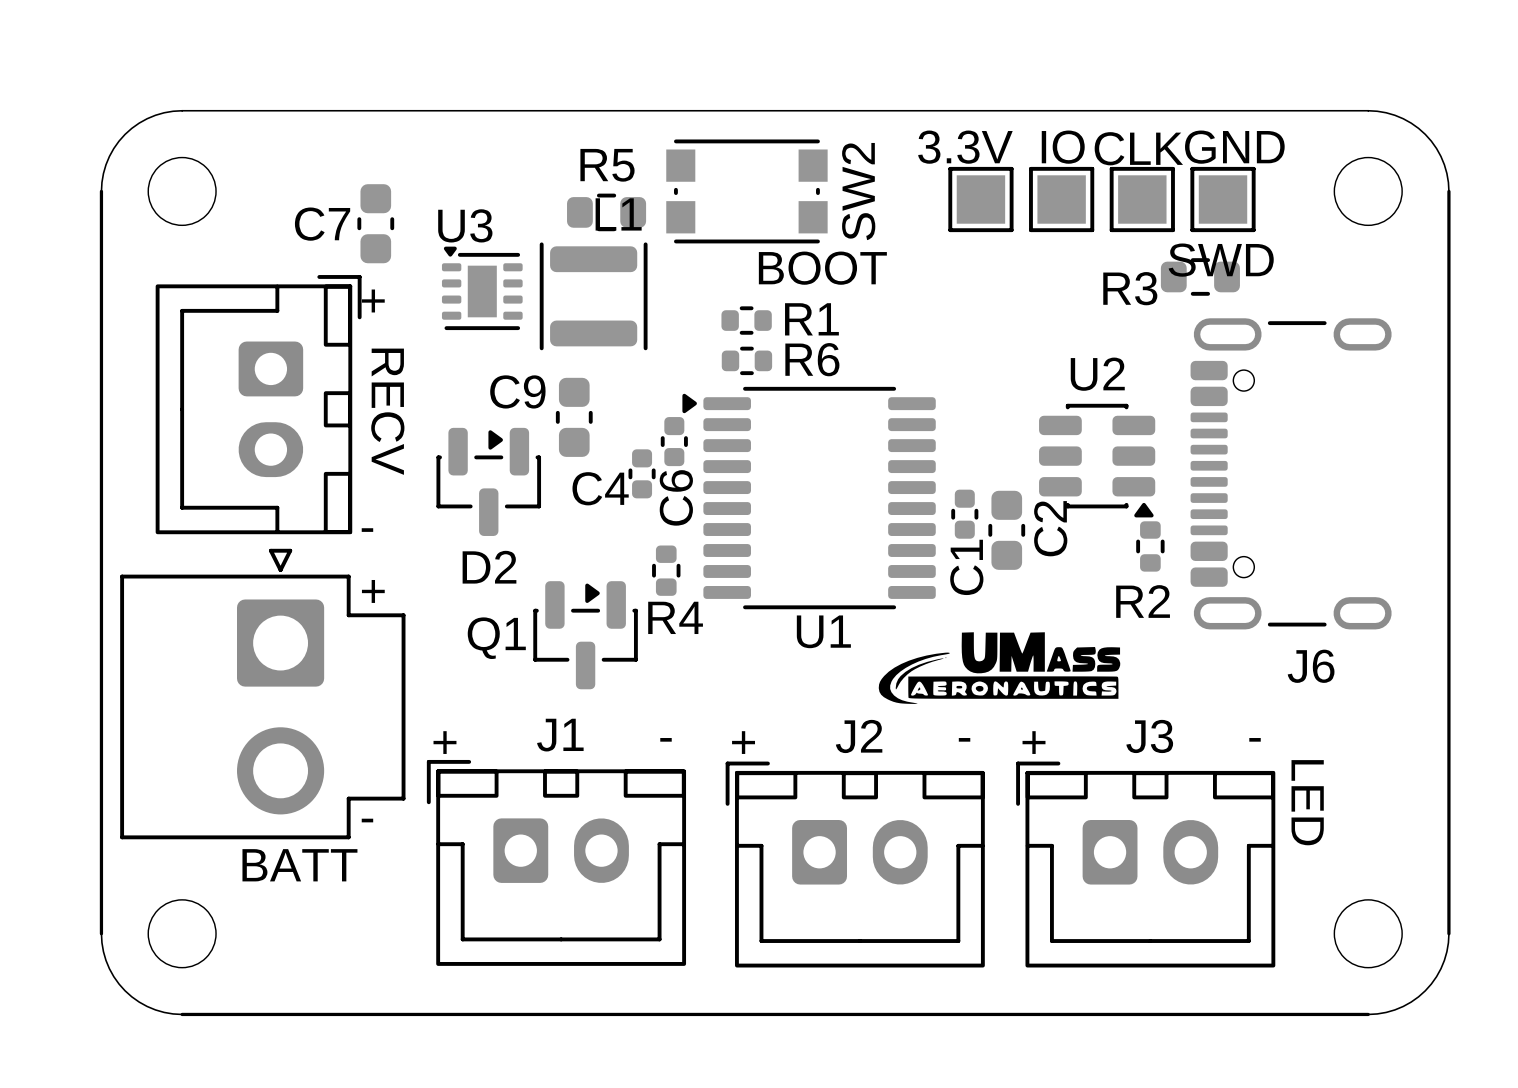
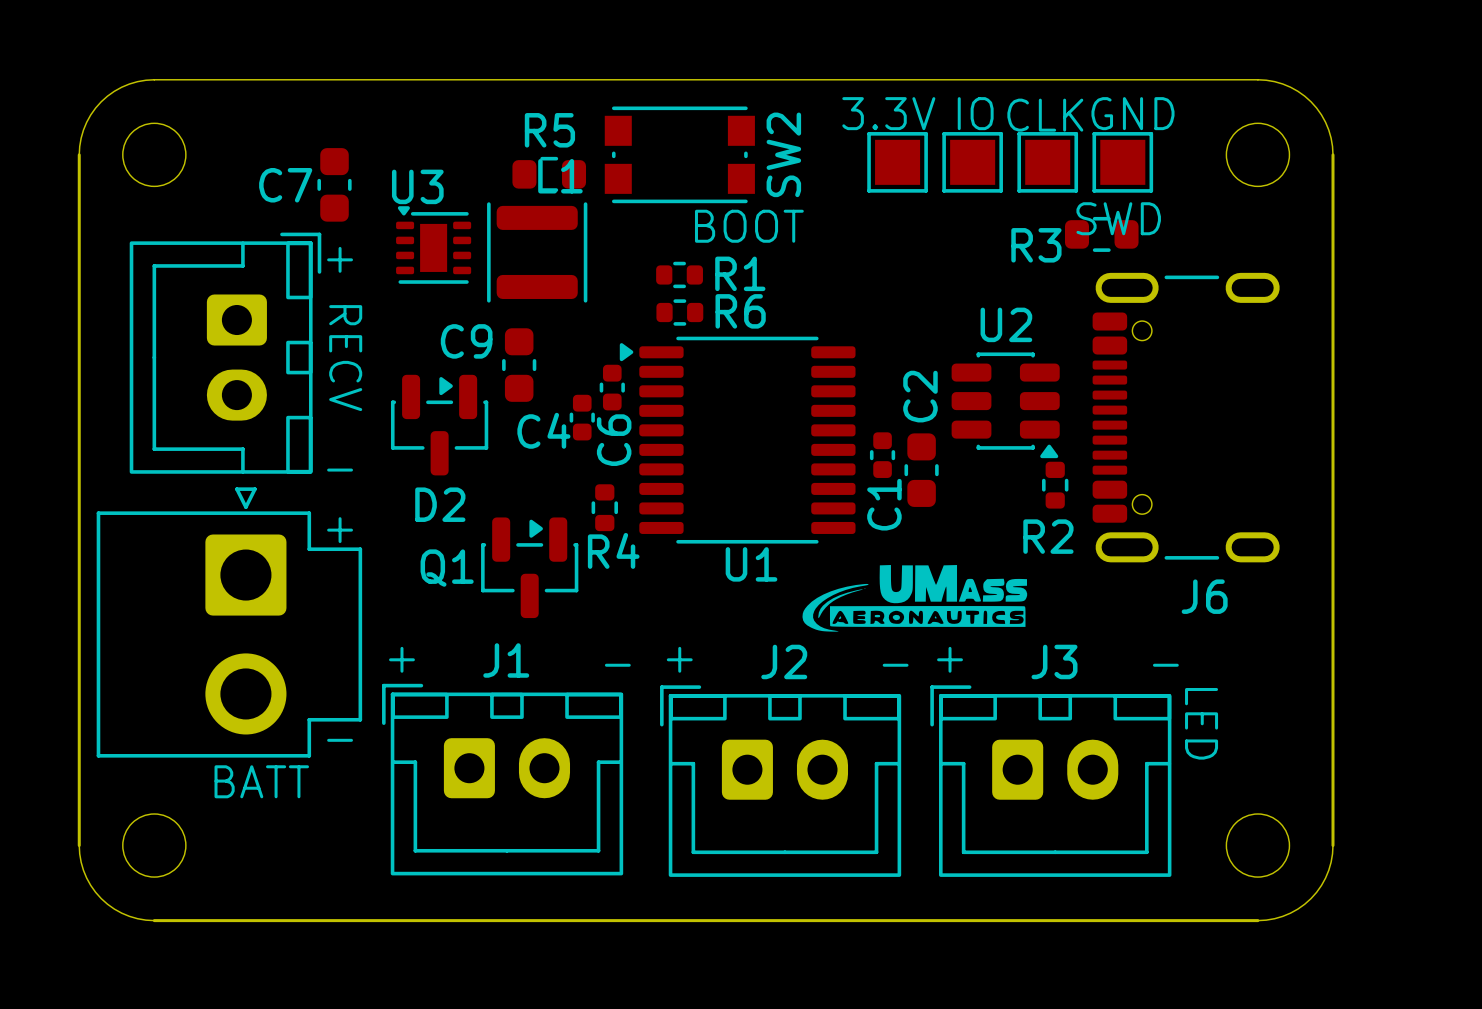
C2 name position: C2 (1050, 528) -> C2 (920, 396)

